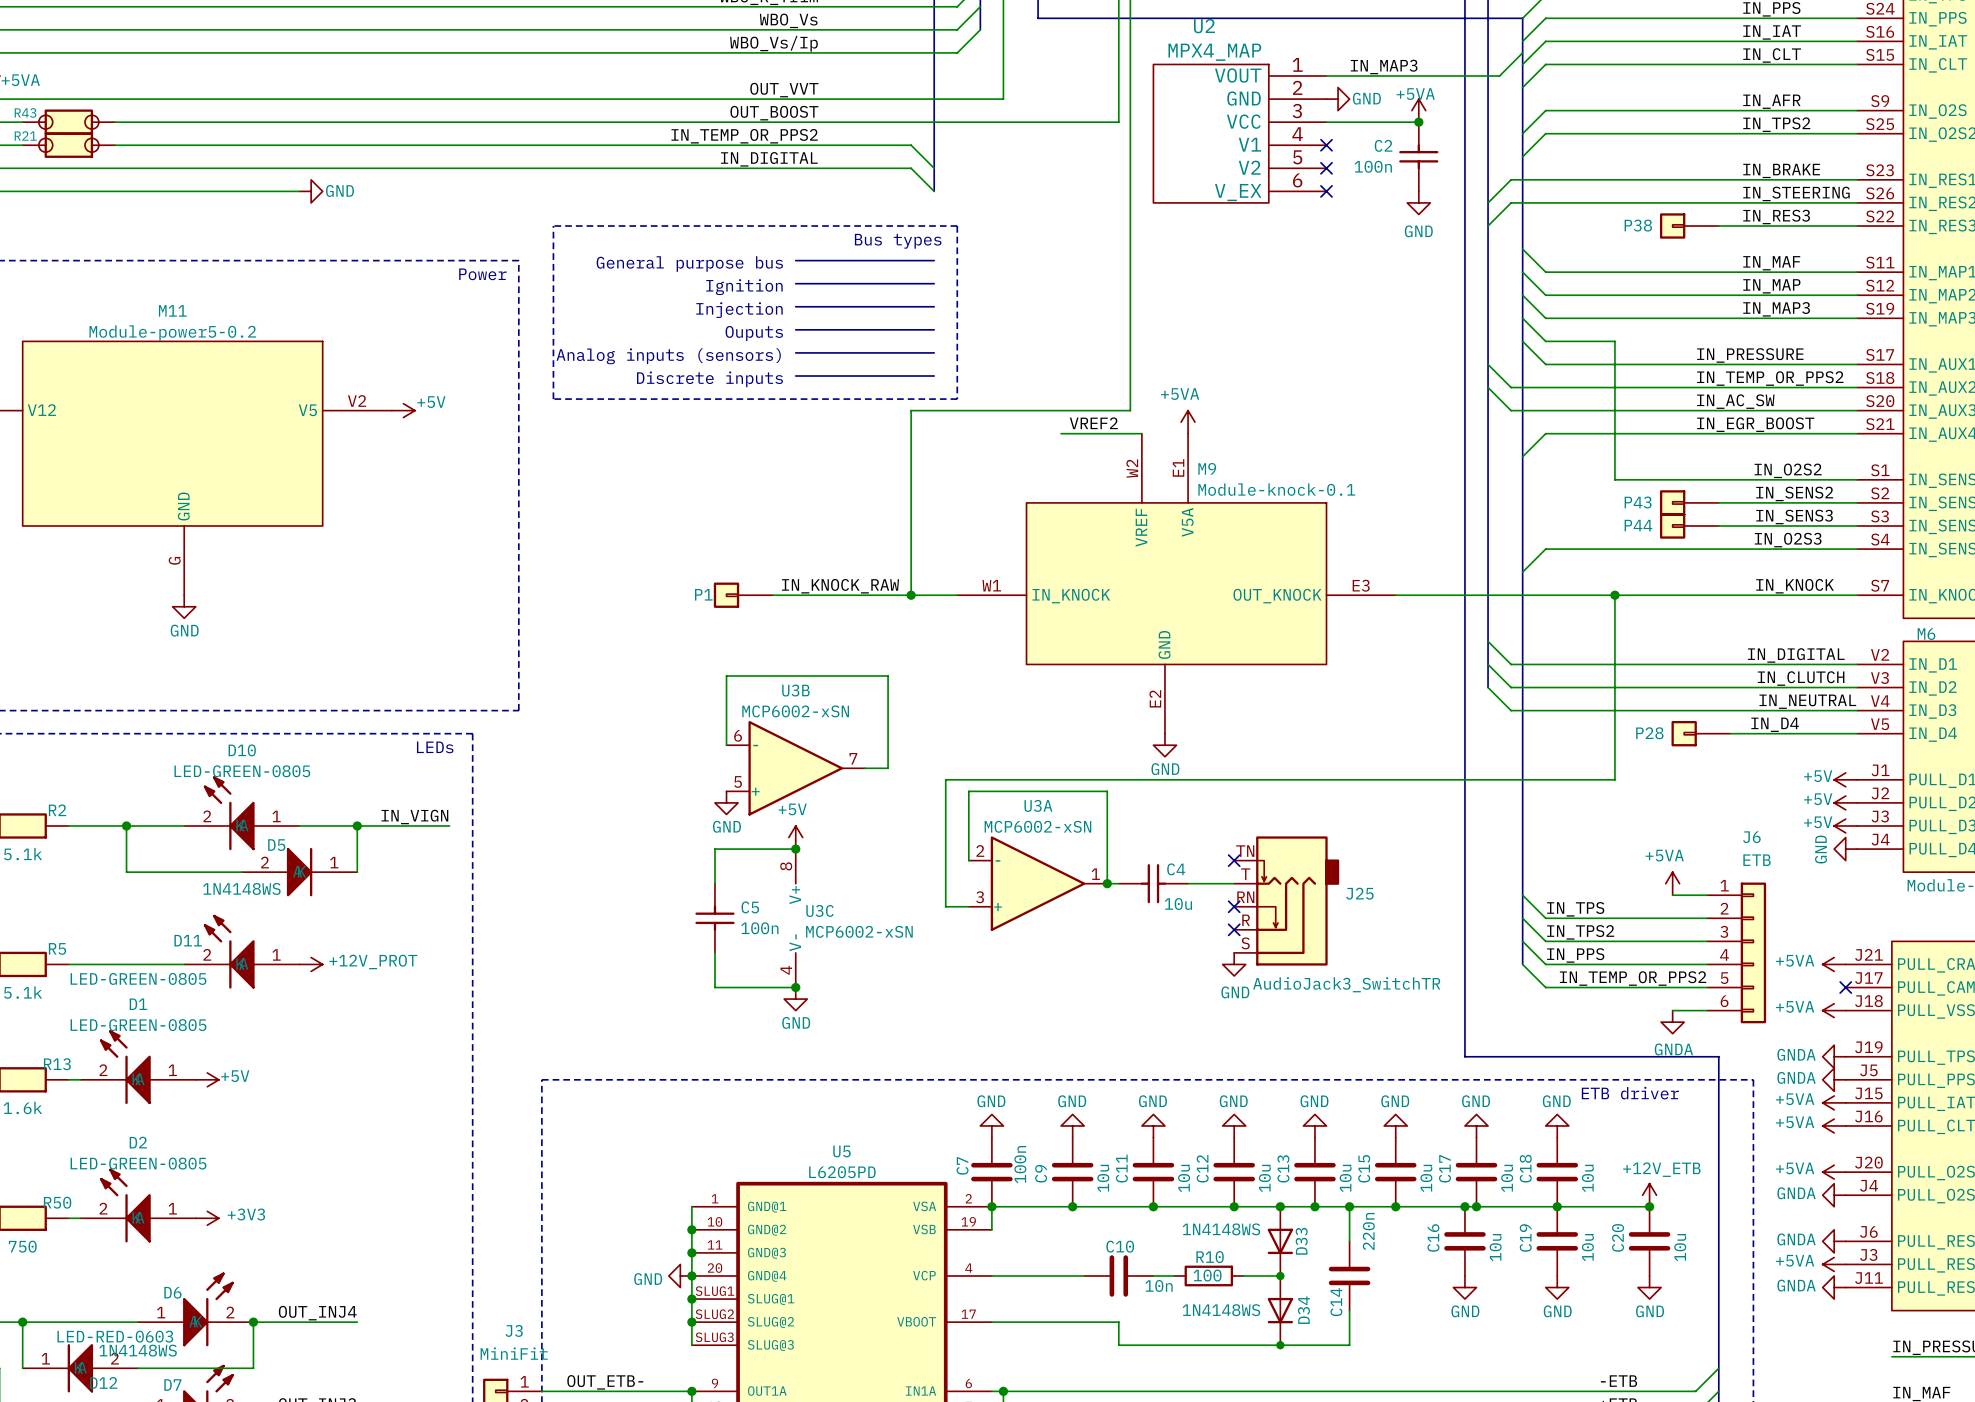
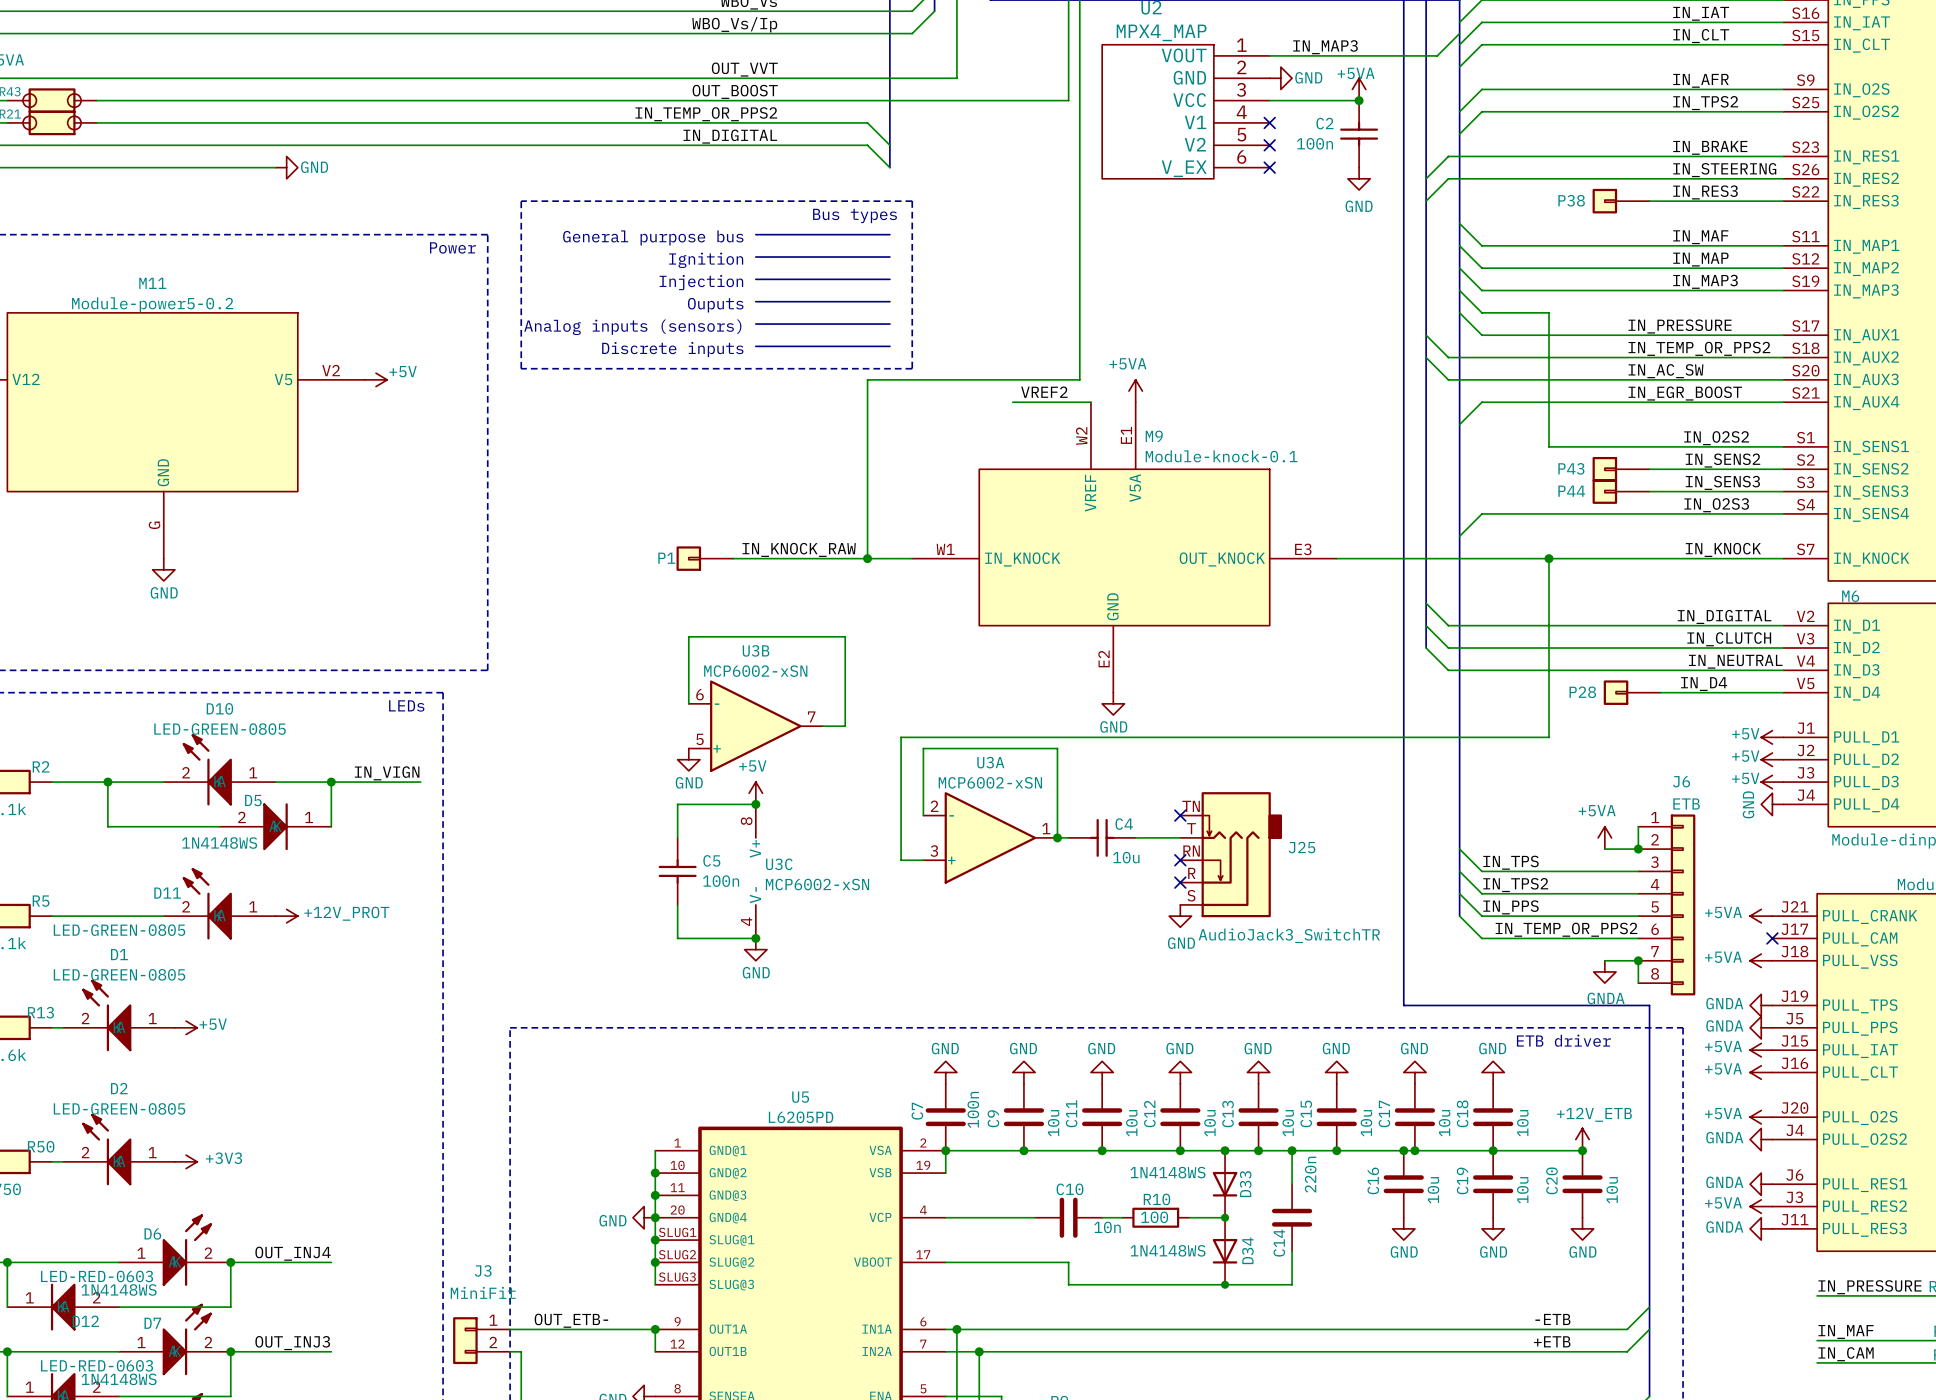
wire: none -> (1638, 826) (1638, 849)
J6 symbol: [1707, 882, 1767, 1024] -> [1638, 814, 1696, 996]
junction: none -> (1638, 849)
wire: none -> (1638, 960) (1638, 983)
junction: none -> (1638, 960)

